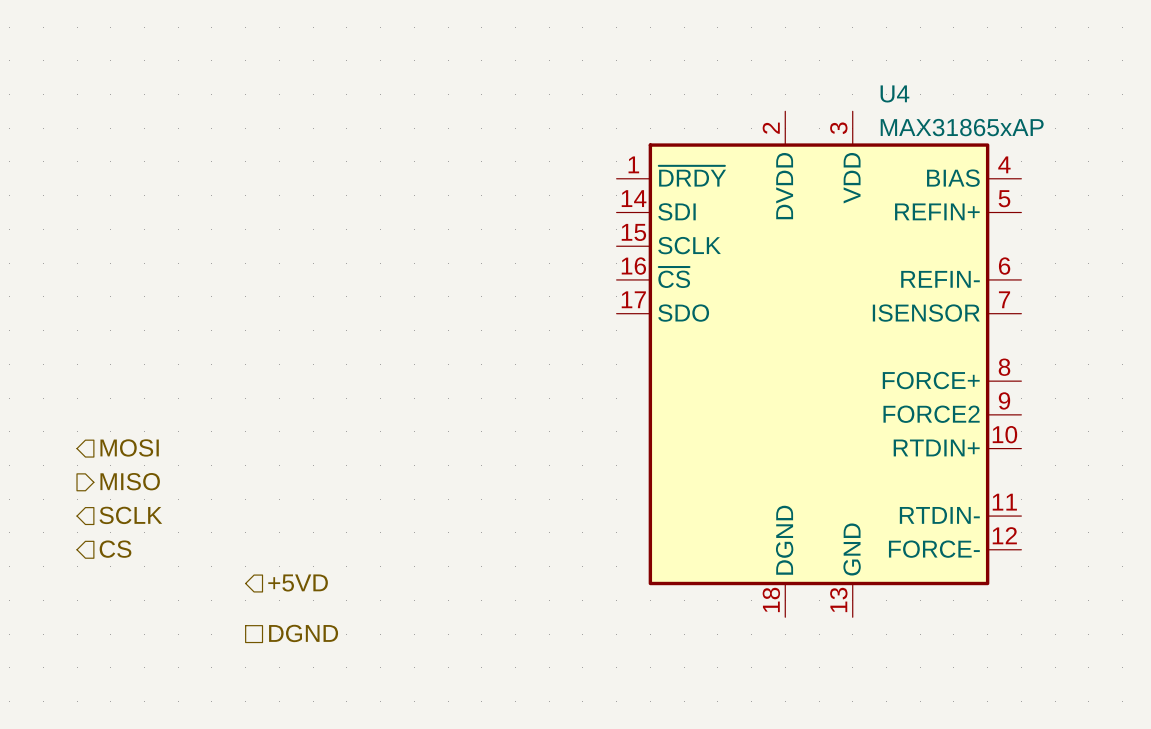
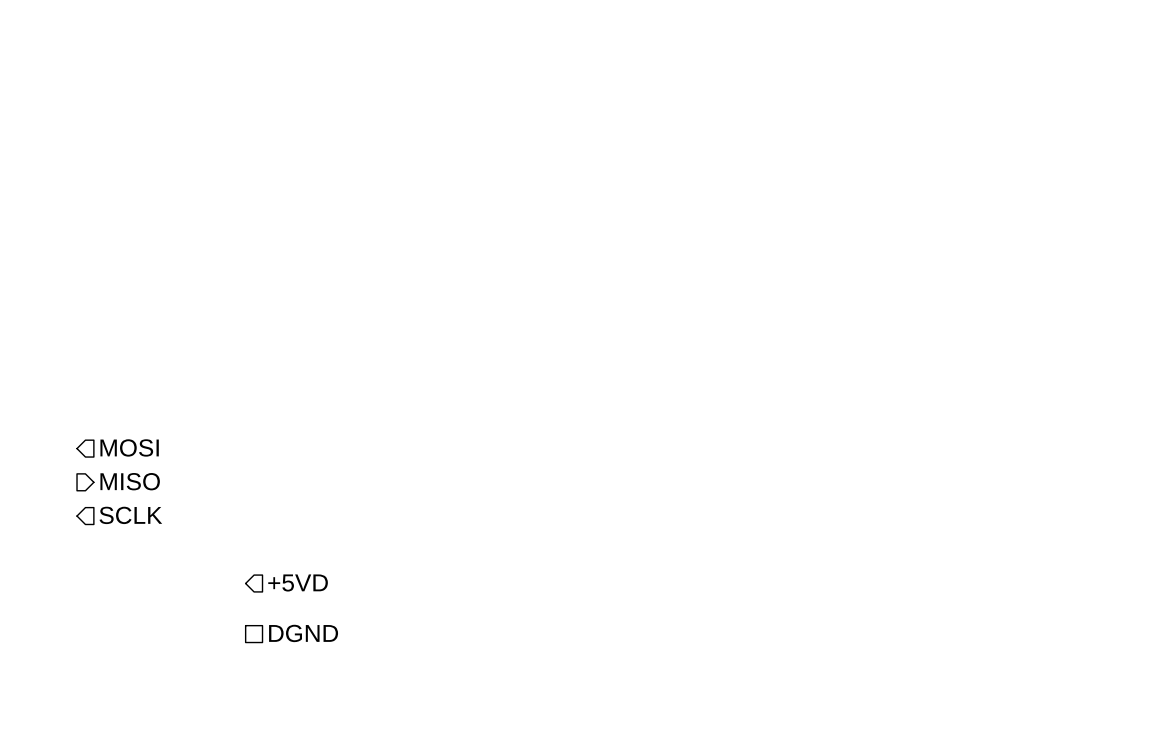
U4: MAX31865xAP (819, 364) -> none
hierarchical label: CS (115, 549) -> none

